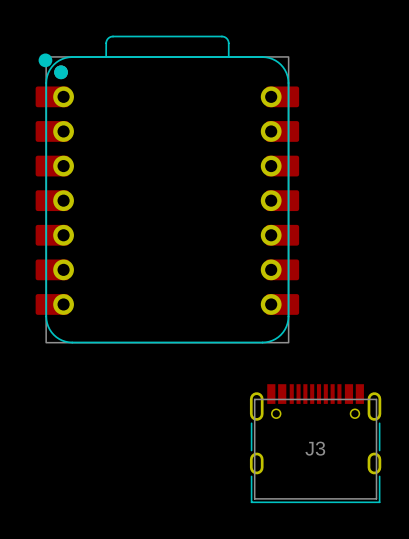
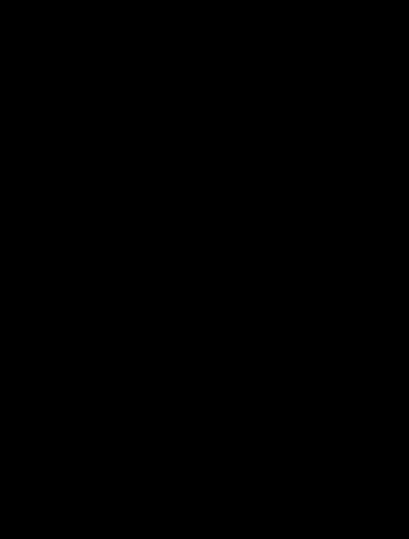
part: (167, 189) -> none
J3: (315, 443) -> none

